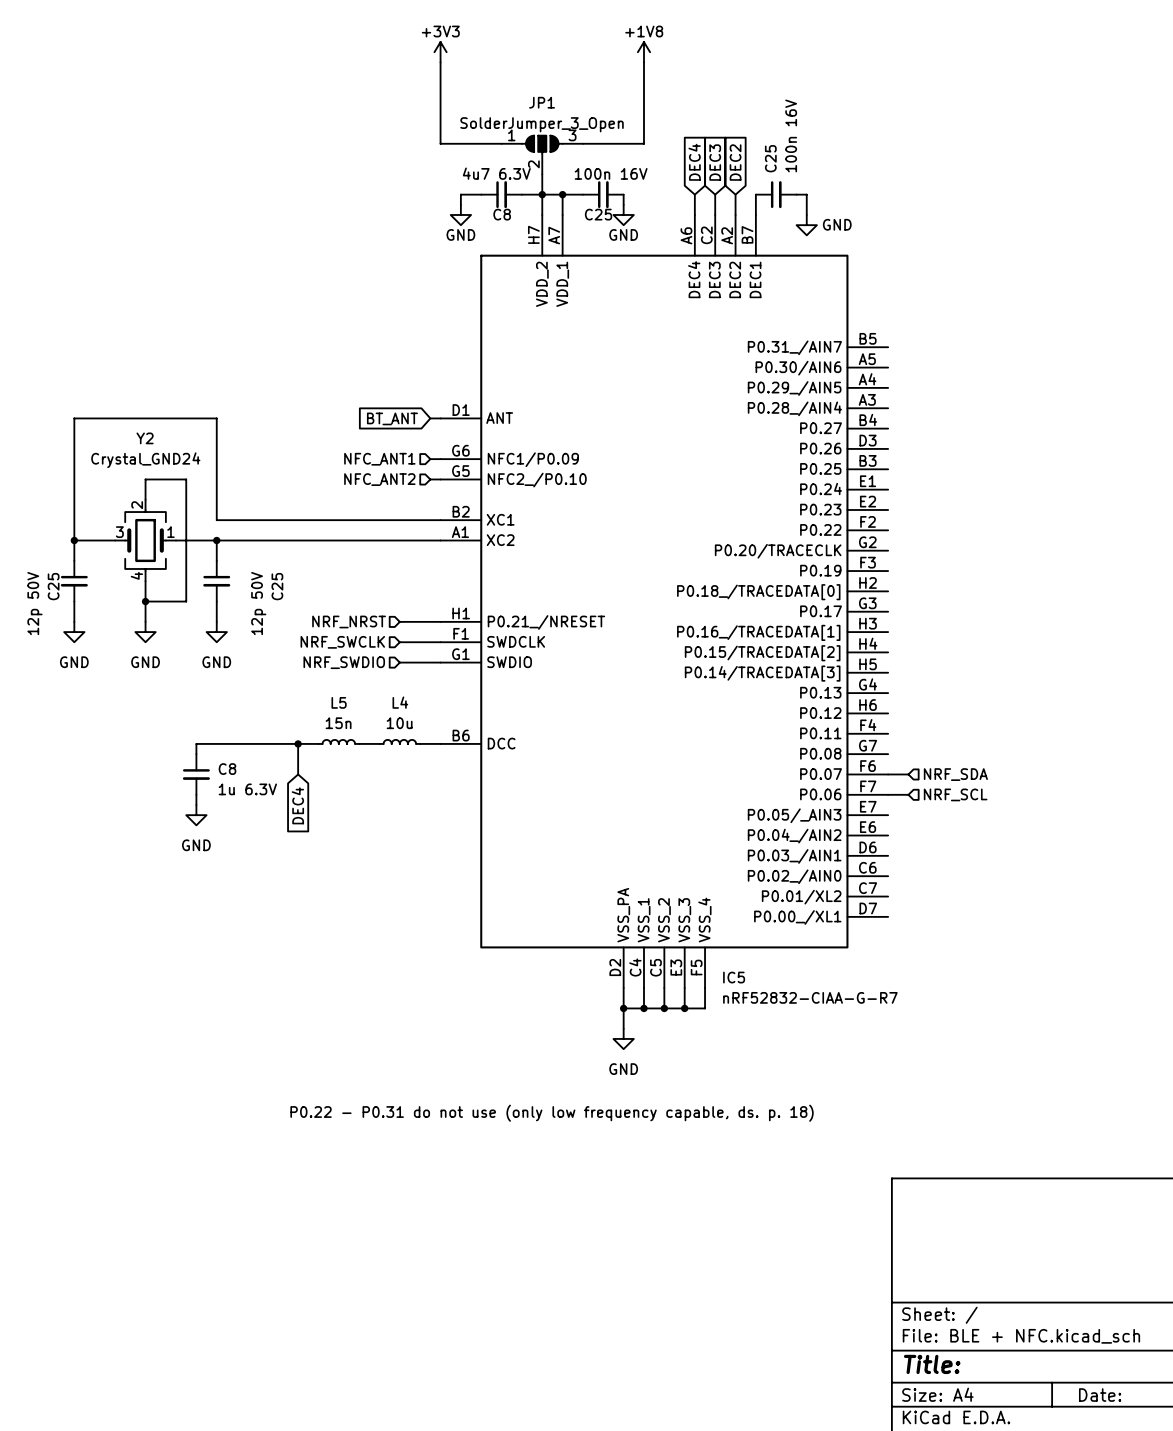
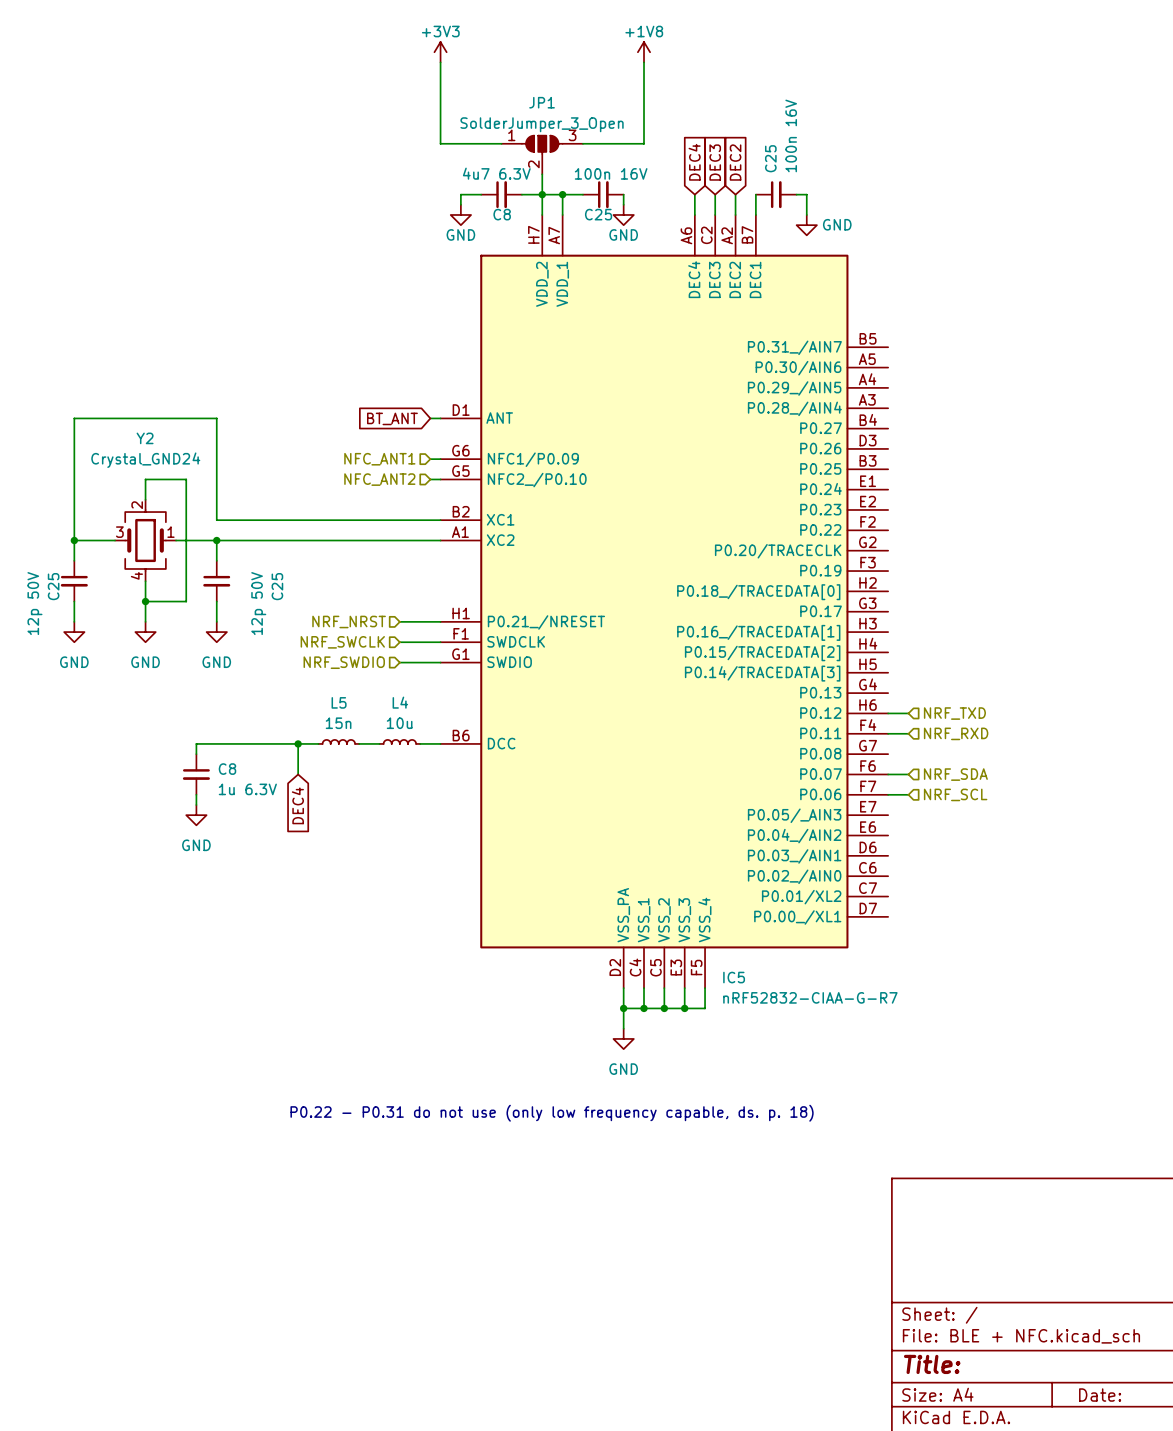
wire: none -> (888, 713) (908, 713)
hierarchical label: none -> NRF_TXD (954, 713)
wire: none -> (888, 733) (908, 733)
hierarchical label: none -> NRF_RXD (956, 733)

